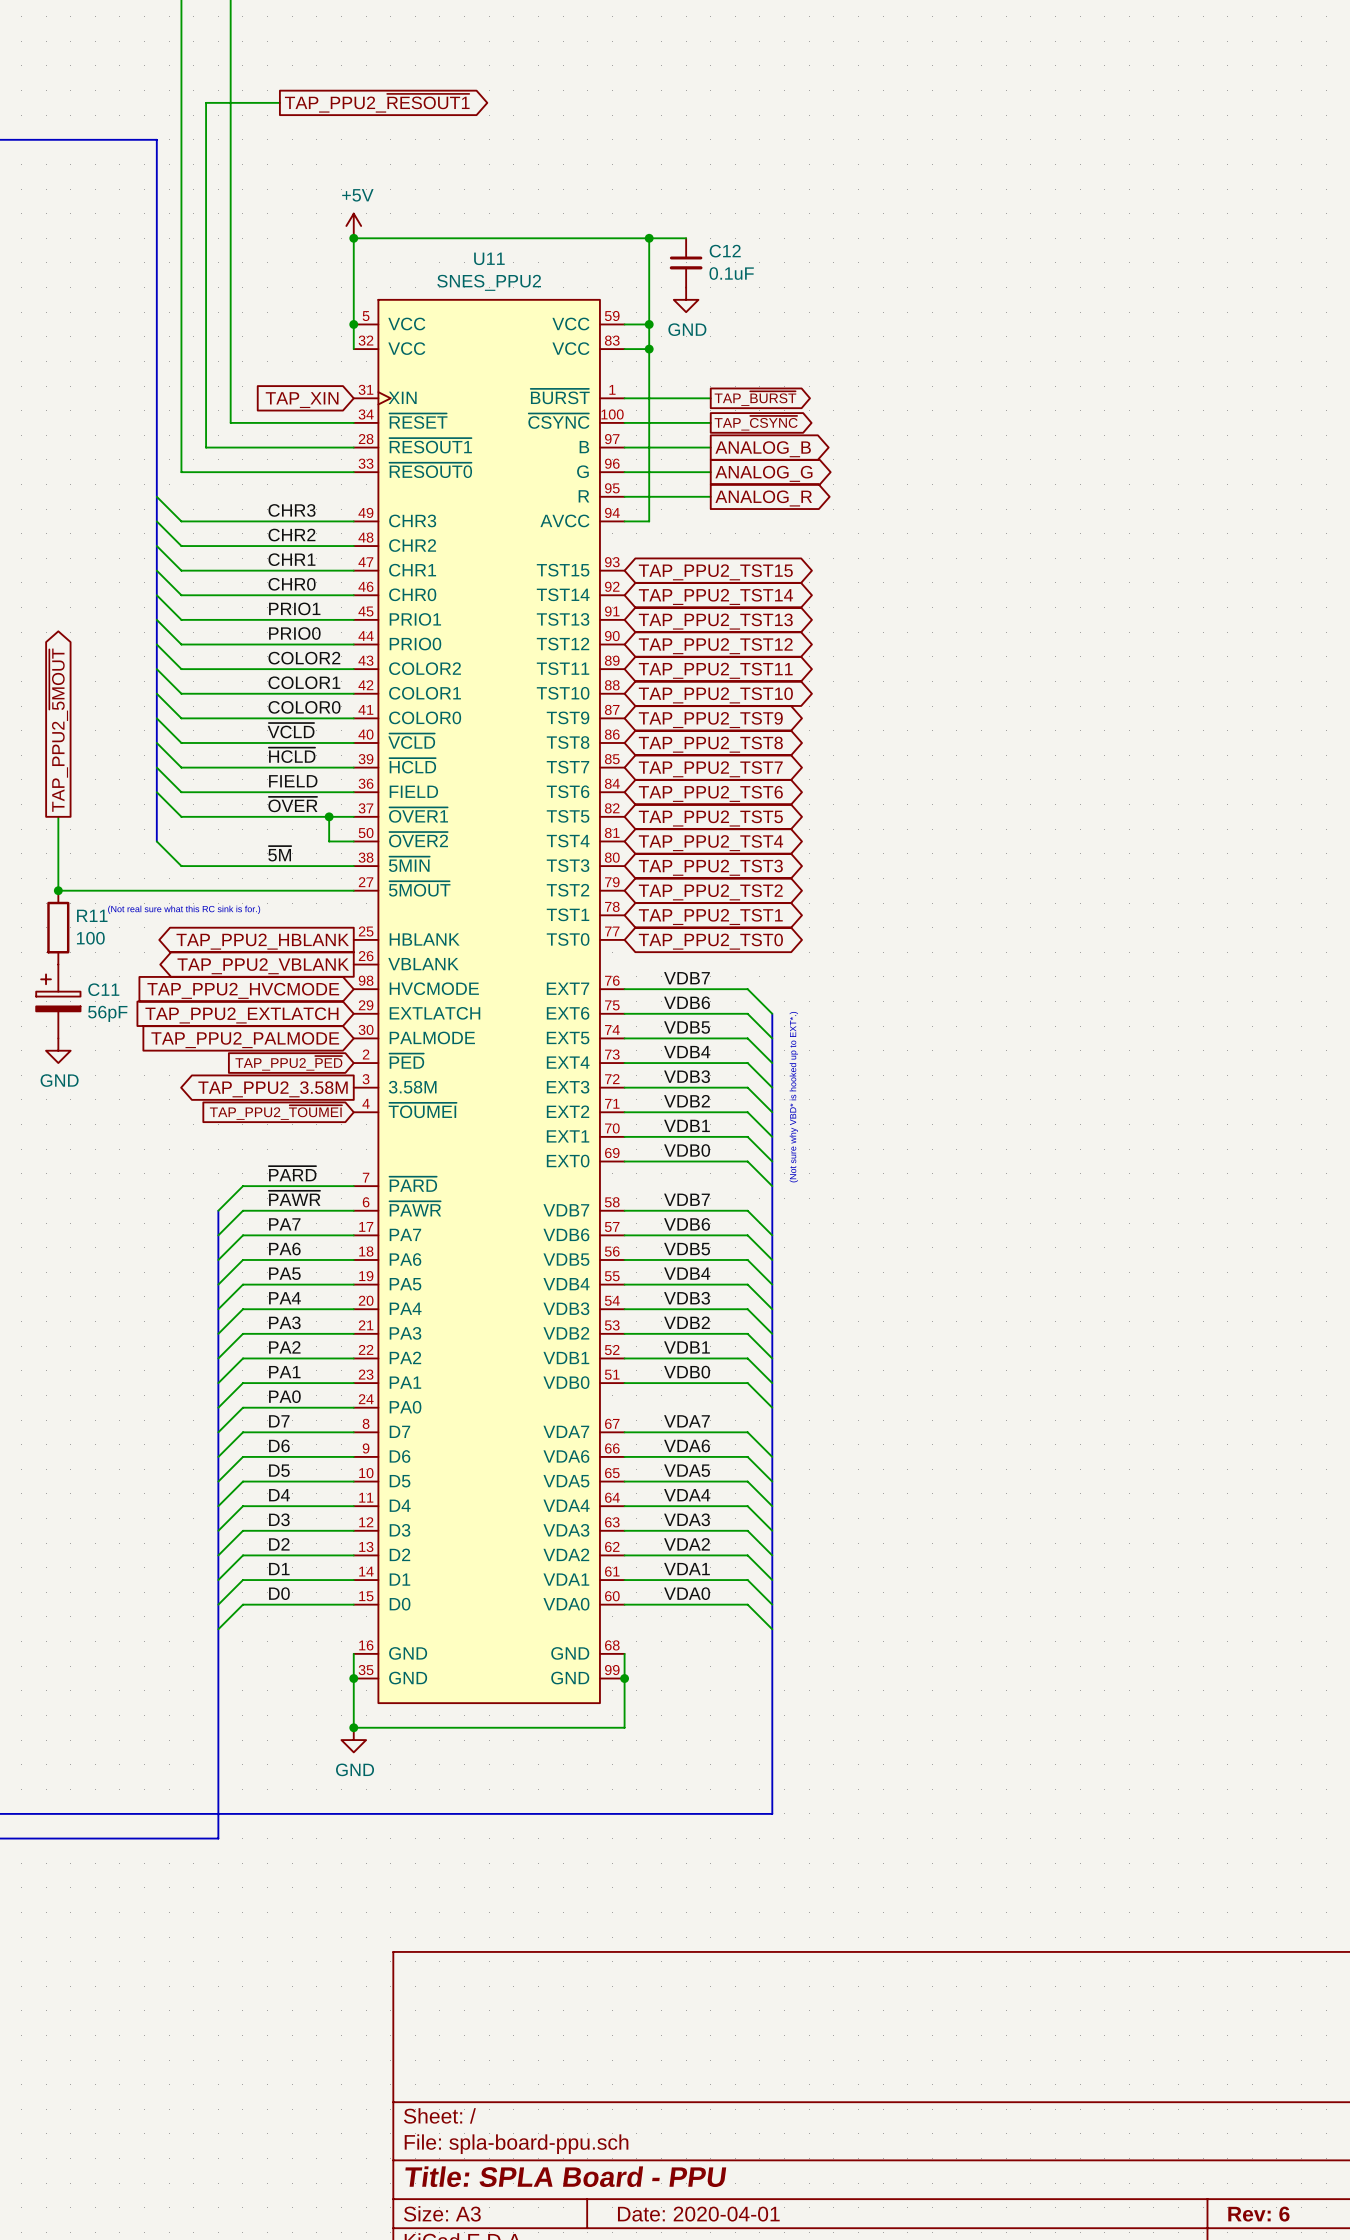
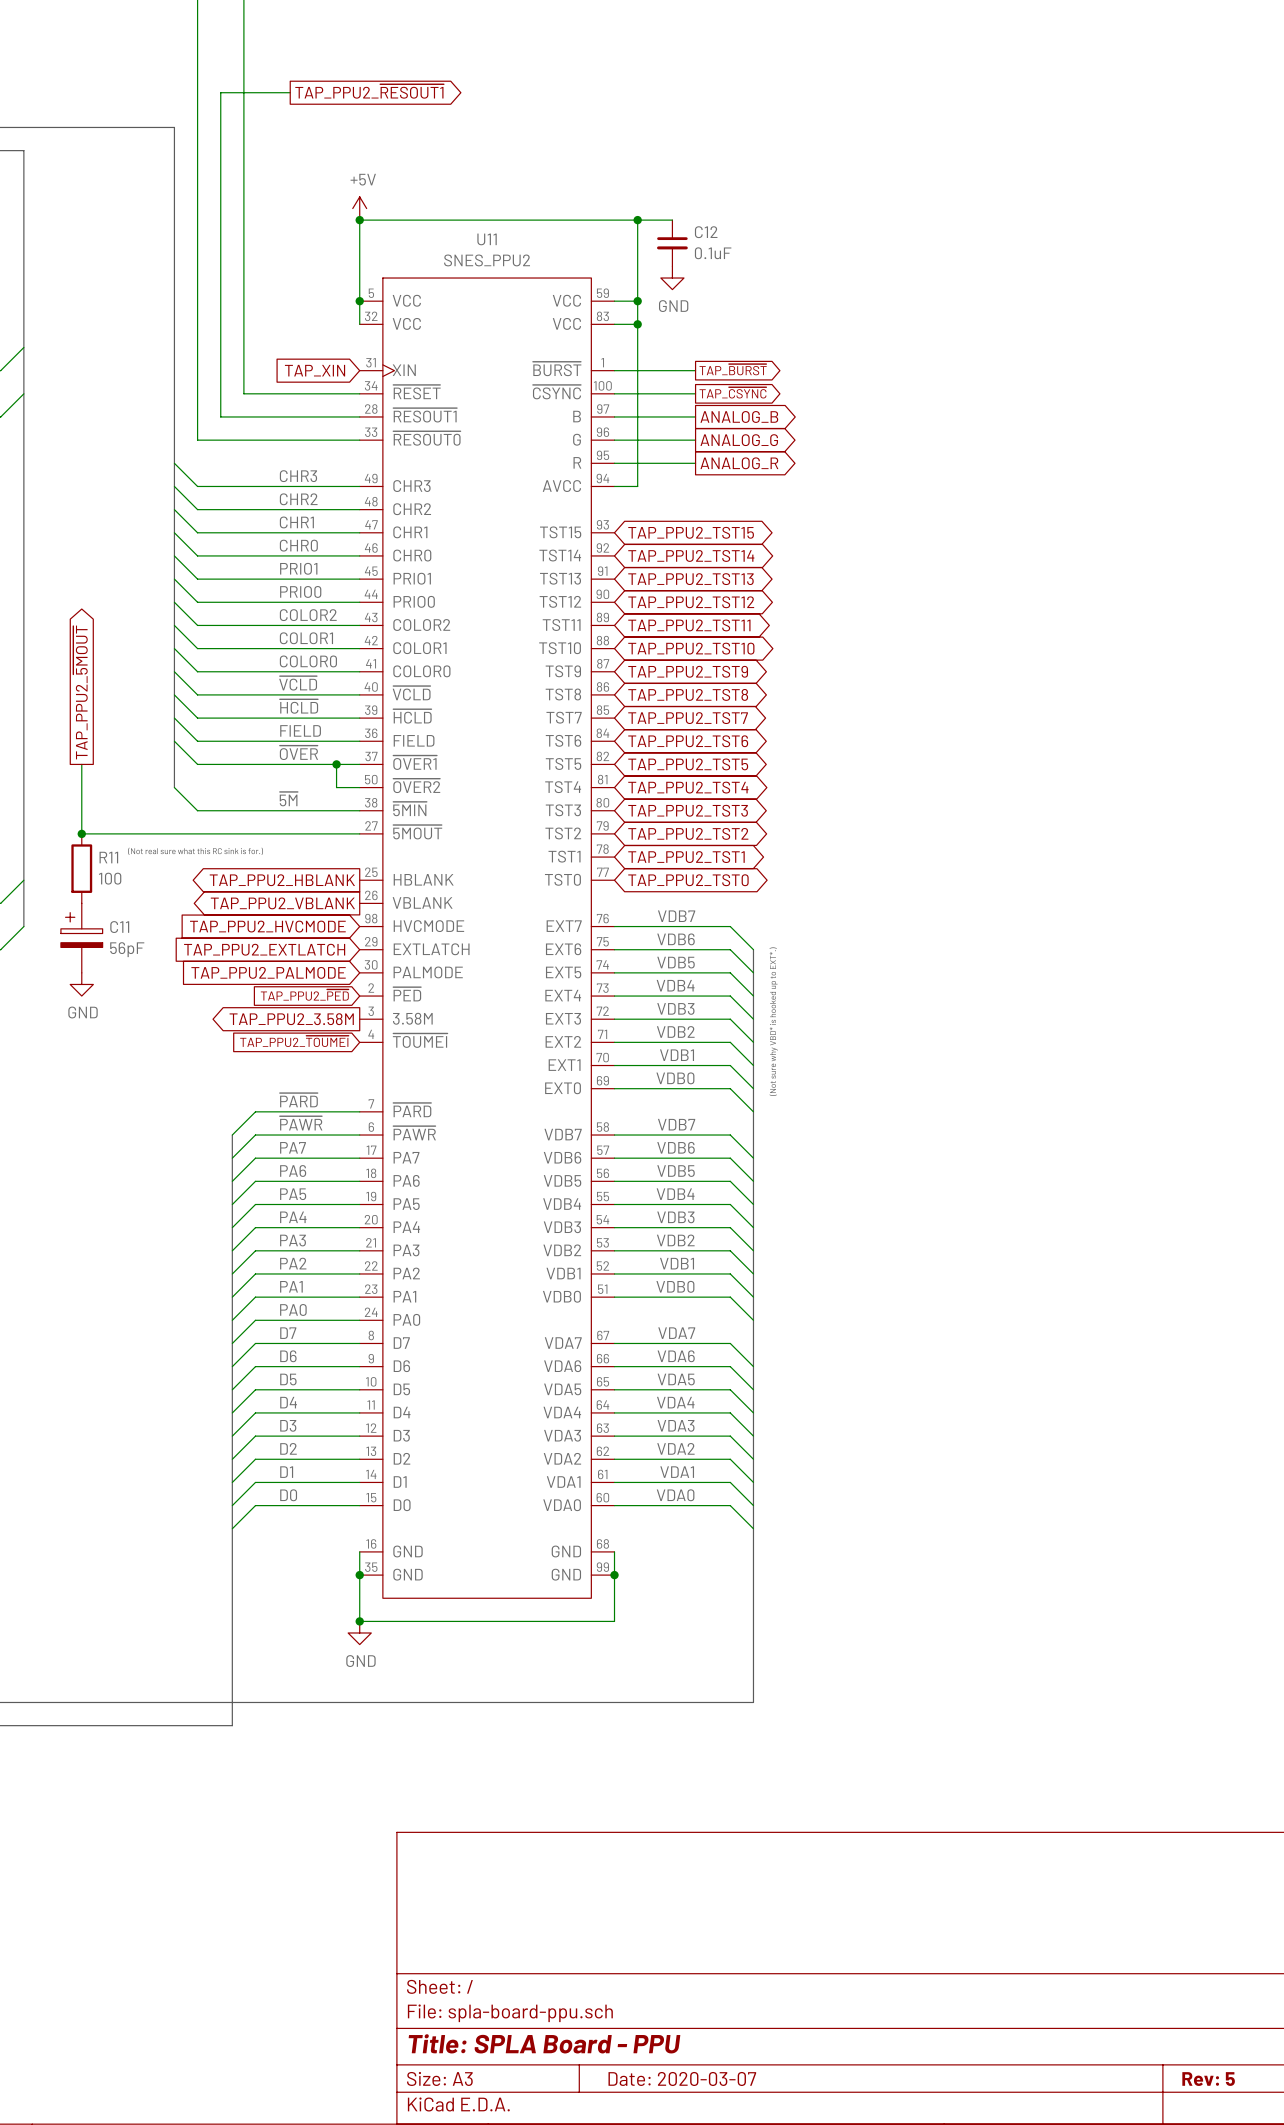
title block: Date: 2020-04-01 (698, 2214) -> Date: 2020-03-07 (682, 2078)
title block: Rev: 6 (1258, 2214) -> Rev: 5 (1208, 2079)

